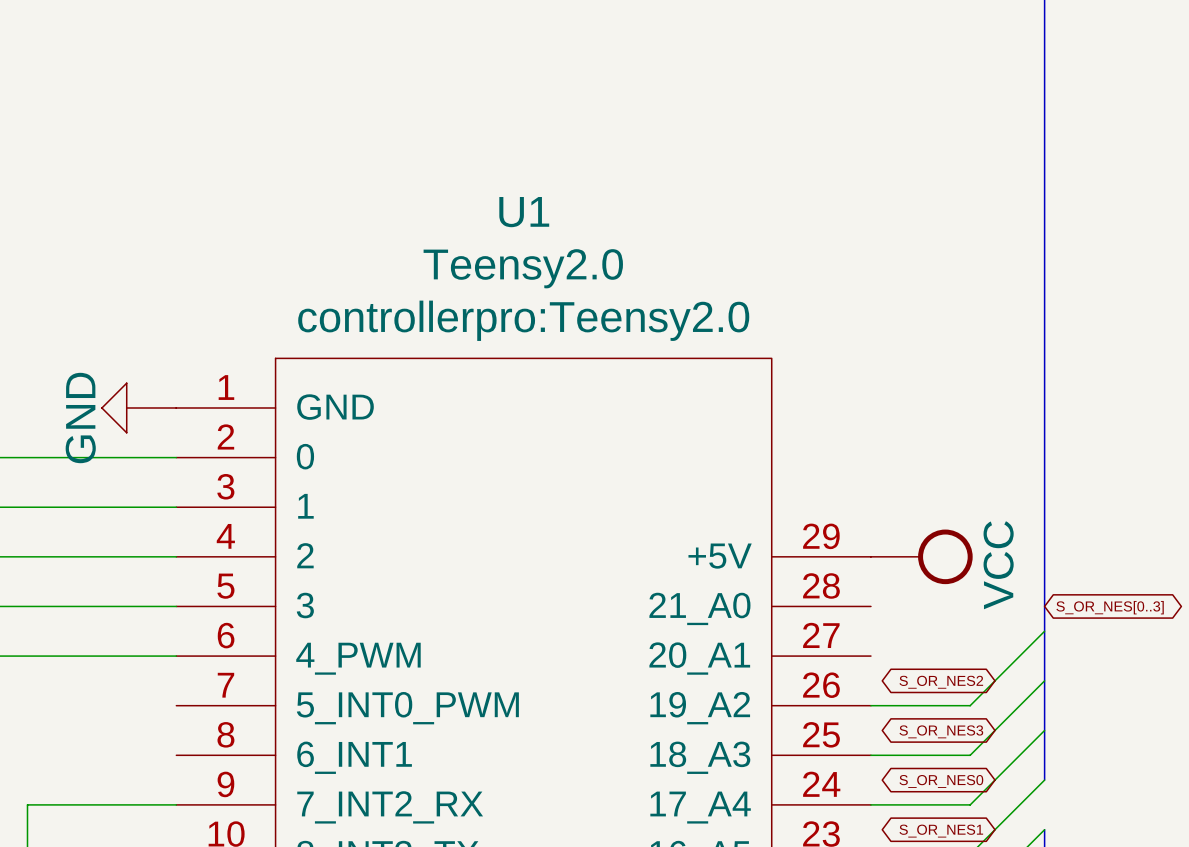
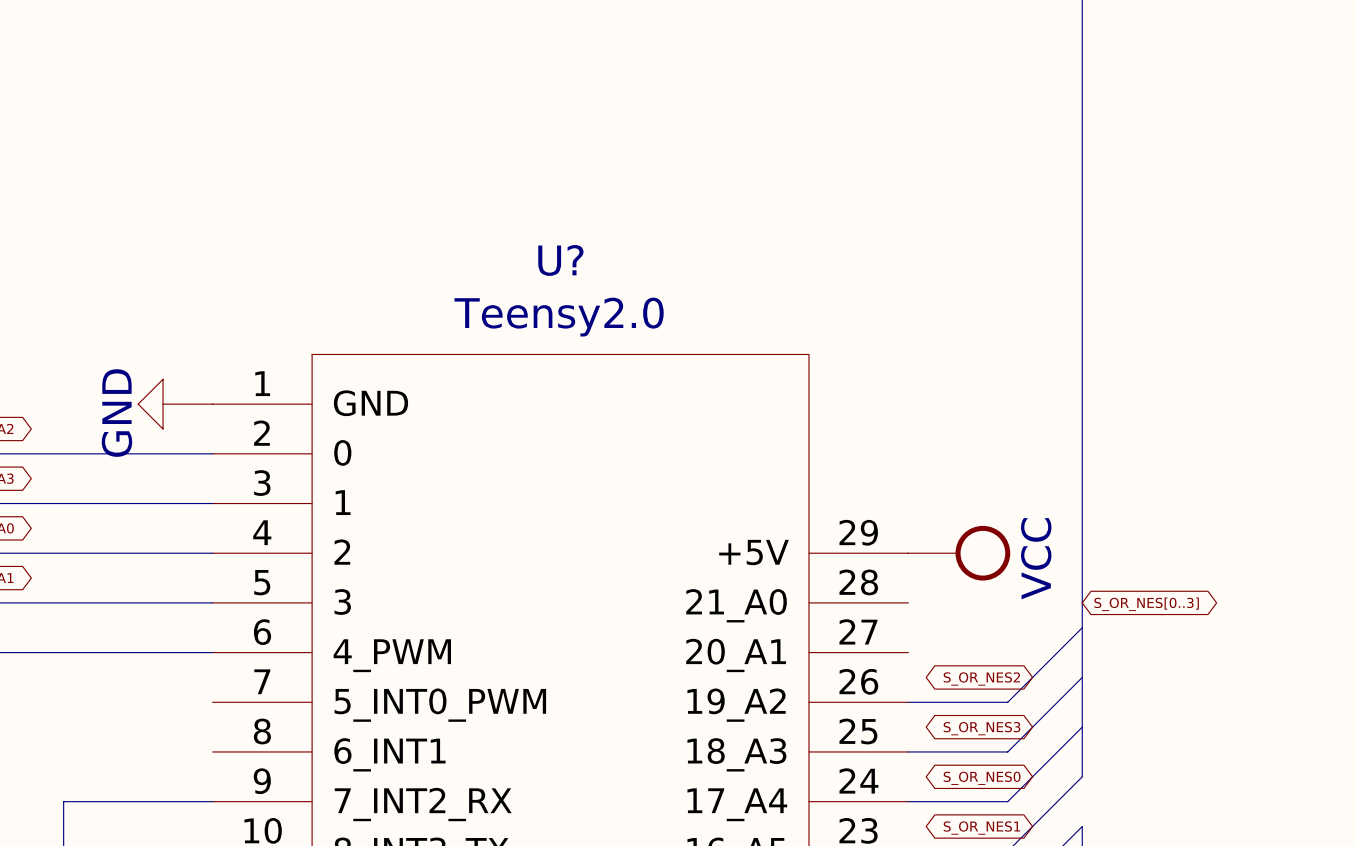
U1 name: U1 (524, 212) -> U? (560, 260)
U1 value position: Teensy2.0 (523, 268) -> Teensy2.0 (559, 317)
U1 text: controllerpro:Teensy2.0 (523, 320) -> none

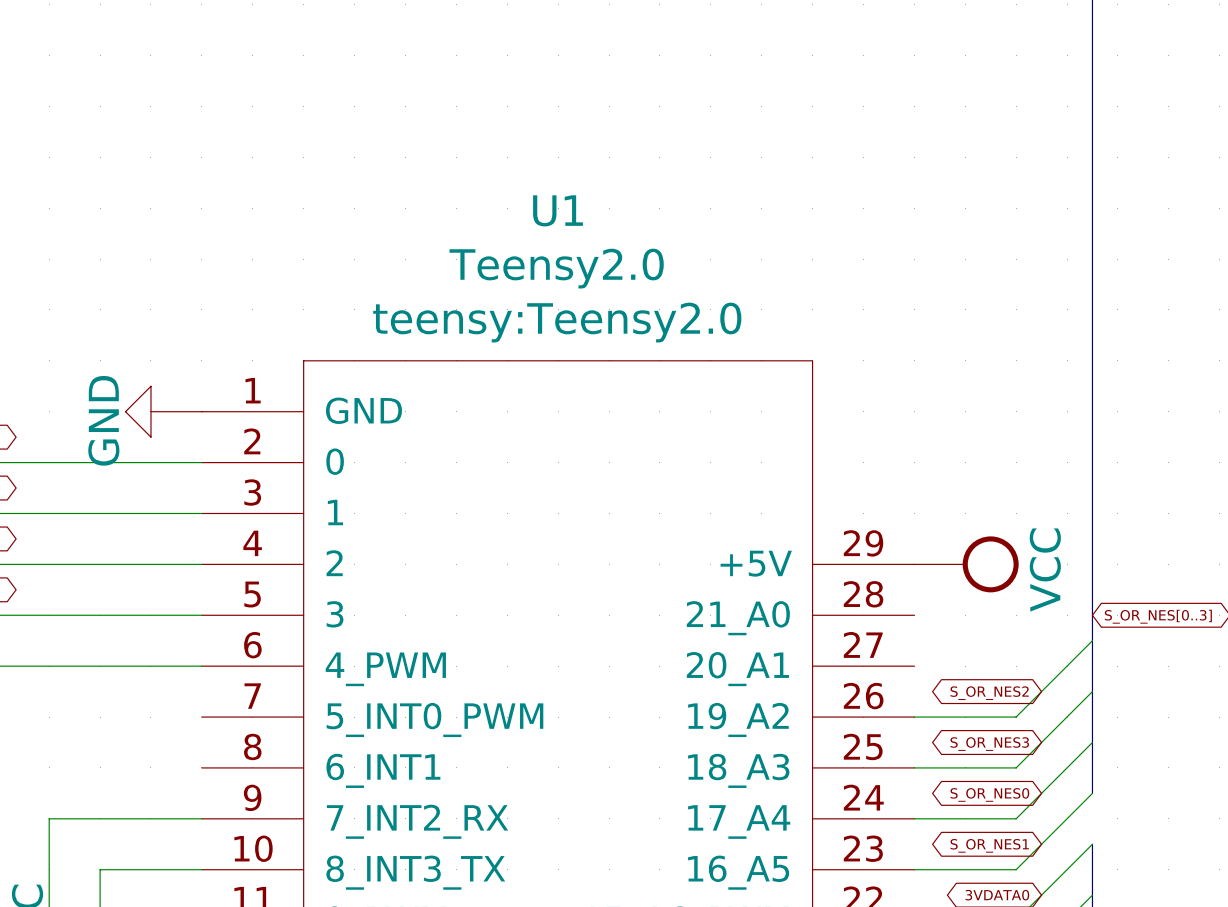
U? name: U? (560, 260) -> U1 (558, 210)
U? text: none -> teensy:Teensy2.0 (557, 322)
U? value position: Teensy2.0 (559, 317) -> Teensy2.0 (556, 268)

